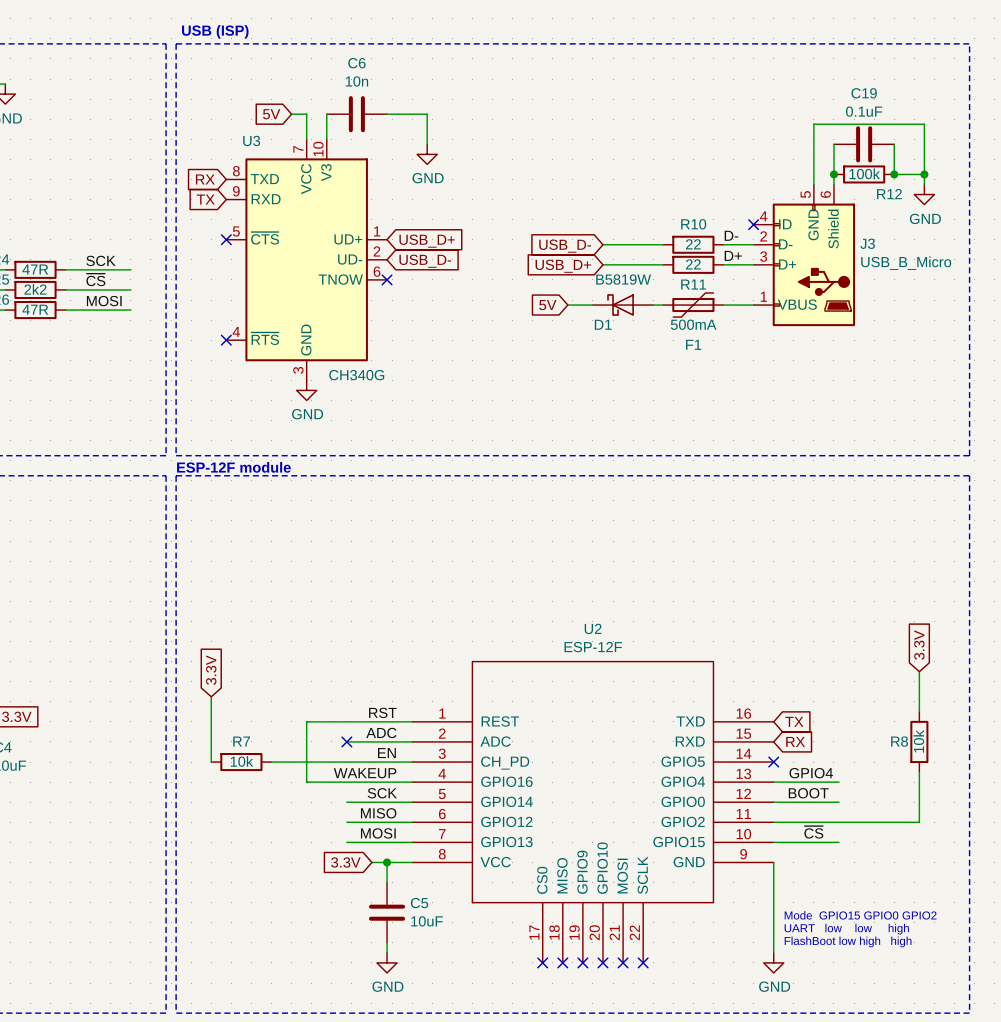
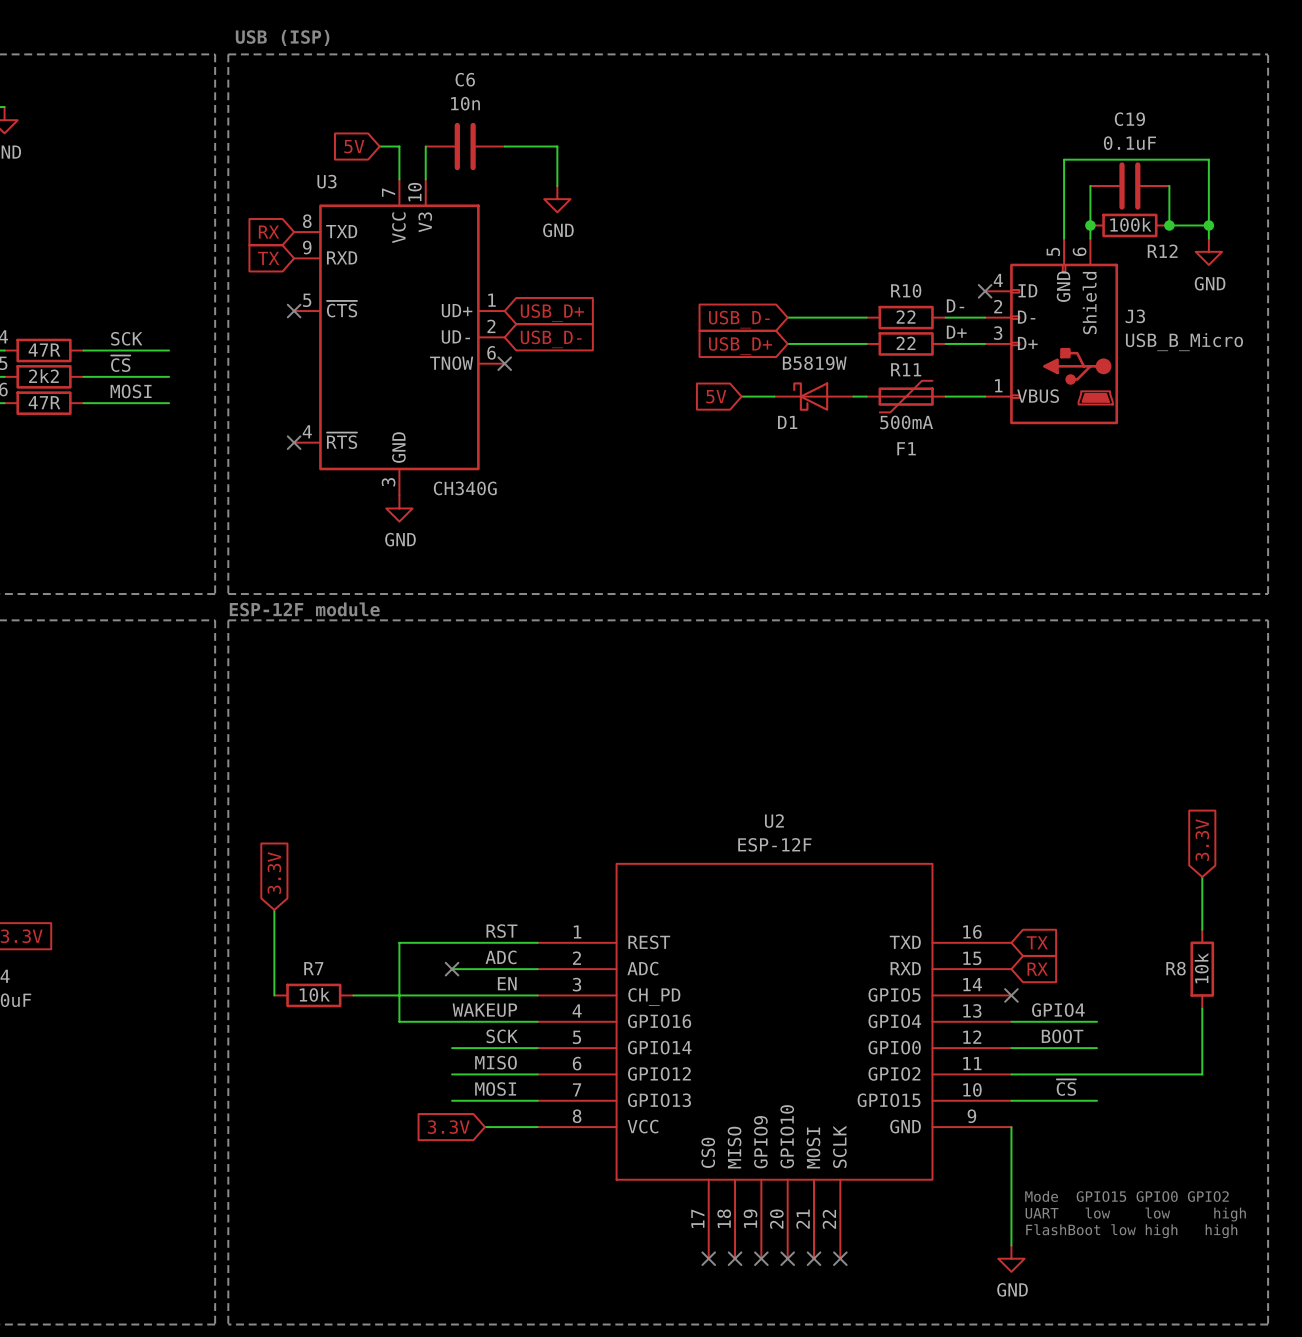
wire: (387, 862) (387, 882) -> none
junction: (387, 862) -> none
C5: 10uF (387, 912) -> none
wire: (387, 942) (387, 952) -> none
power symbol: GND (387, 962) -> none

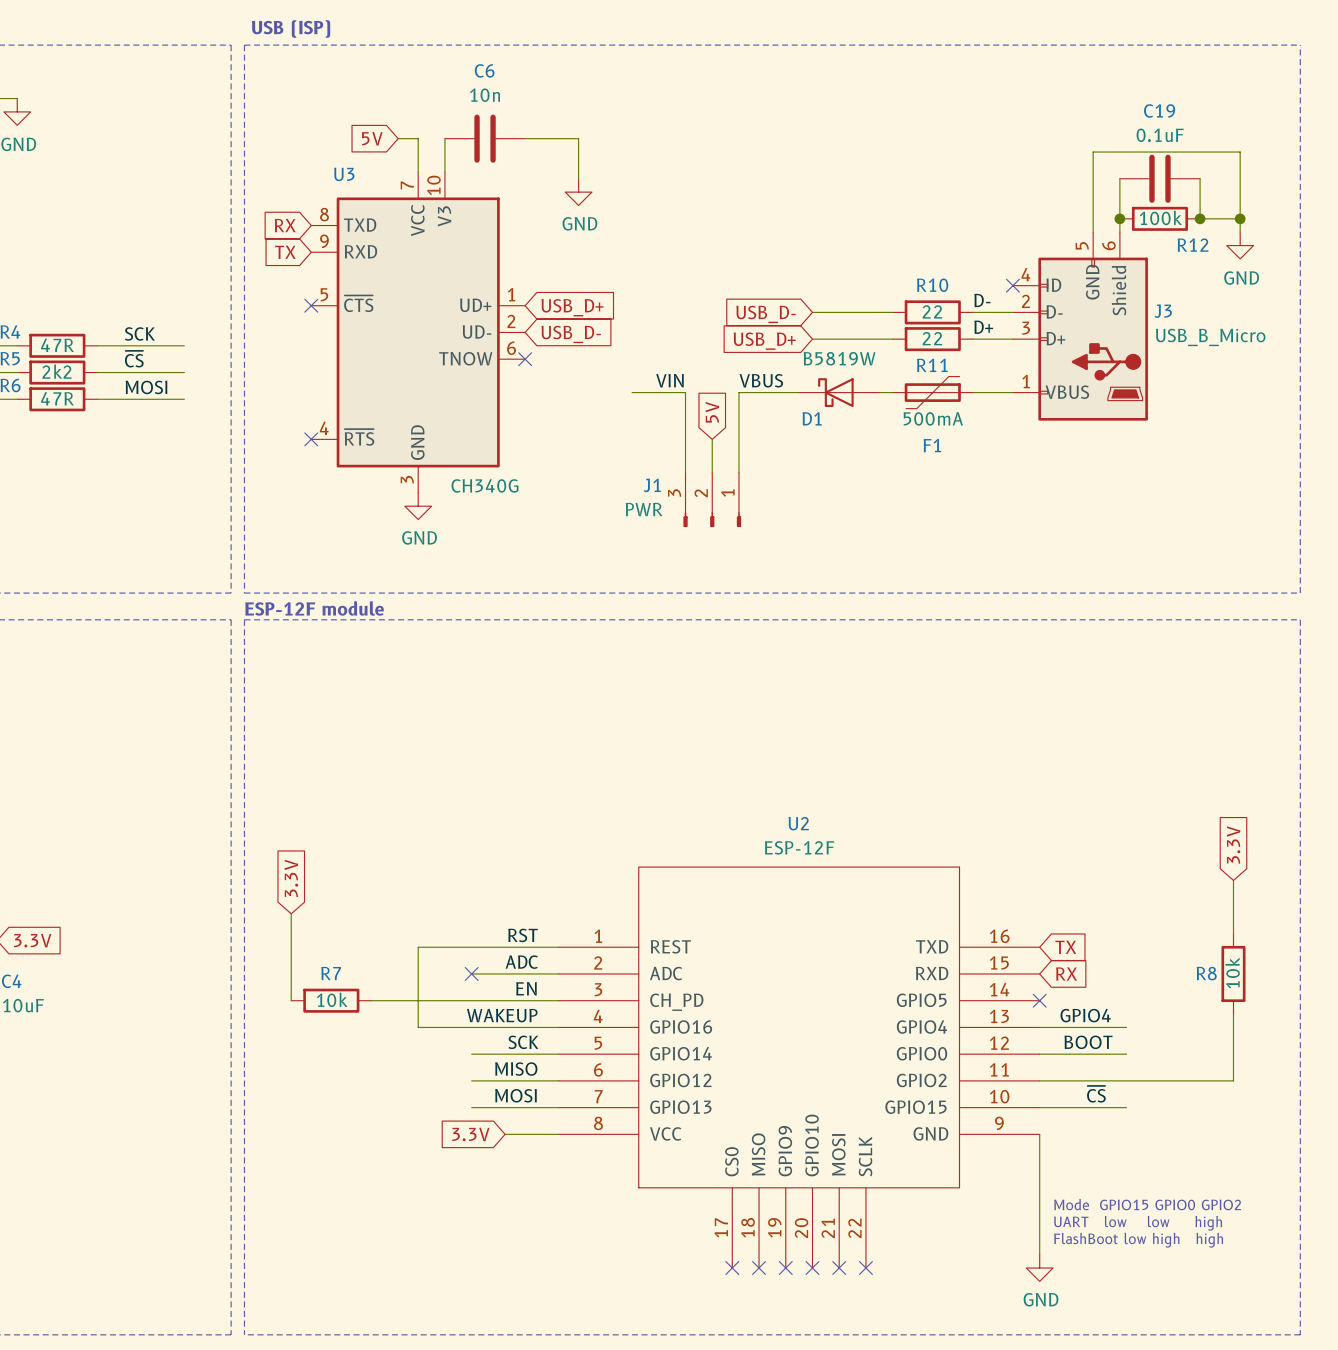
label: none -> VIN (669, 380)
label: none -> VBUS (761, 380)
wire: none -> (632, 392) (685, 392) (685, 472)
global label rotation: 0° (716, 396) -> 90° clockwise (712, 412)
wire: none -> (765, 392) (738, 392) (738, 472)
wire: none -> (712, 439) (712, 472)
J1: none -> PWR (712, 499)

